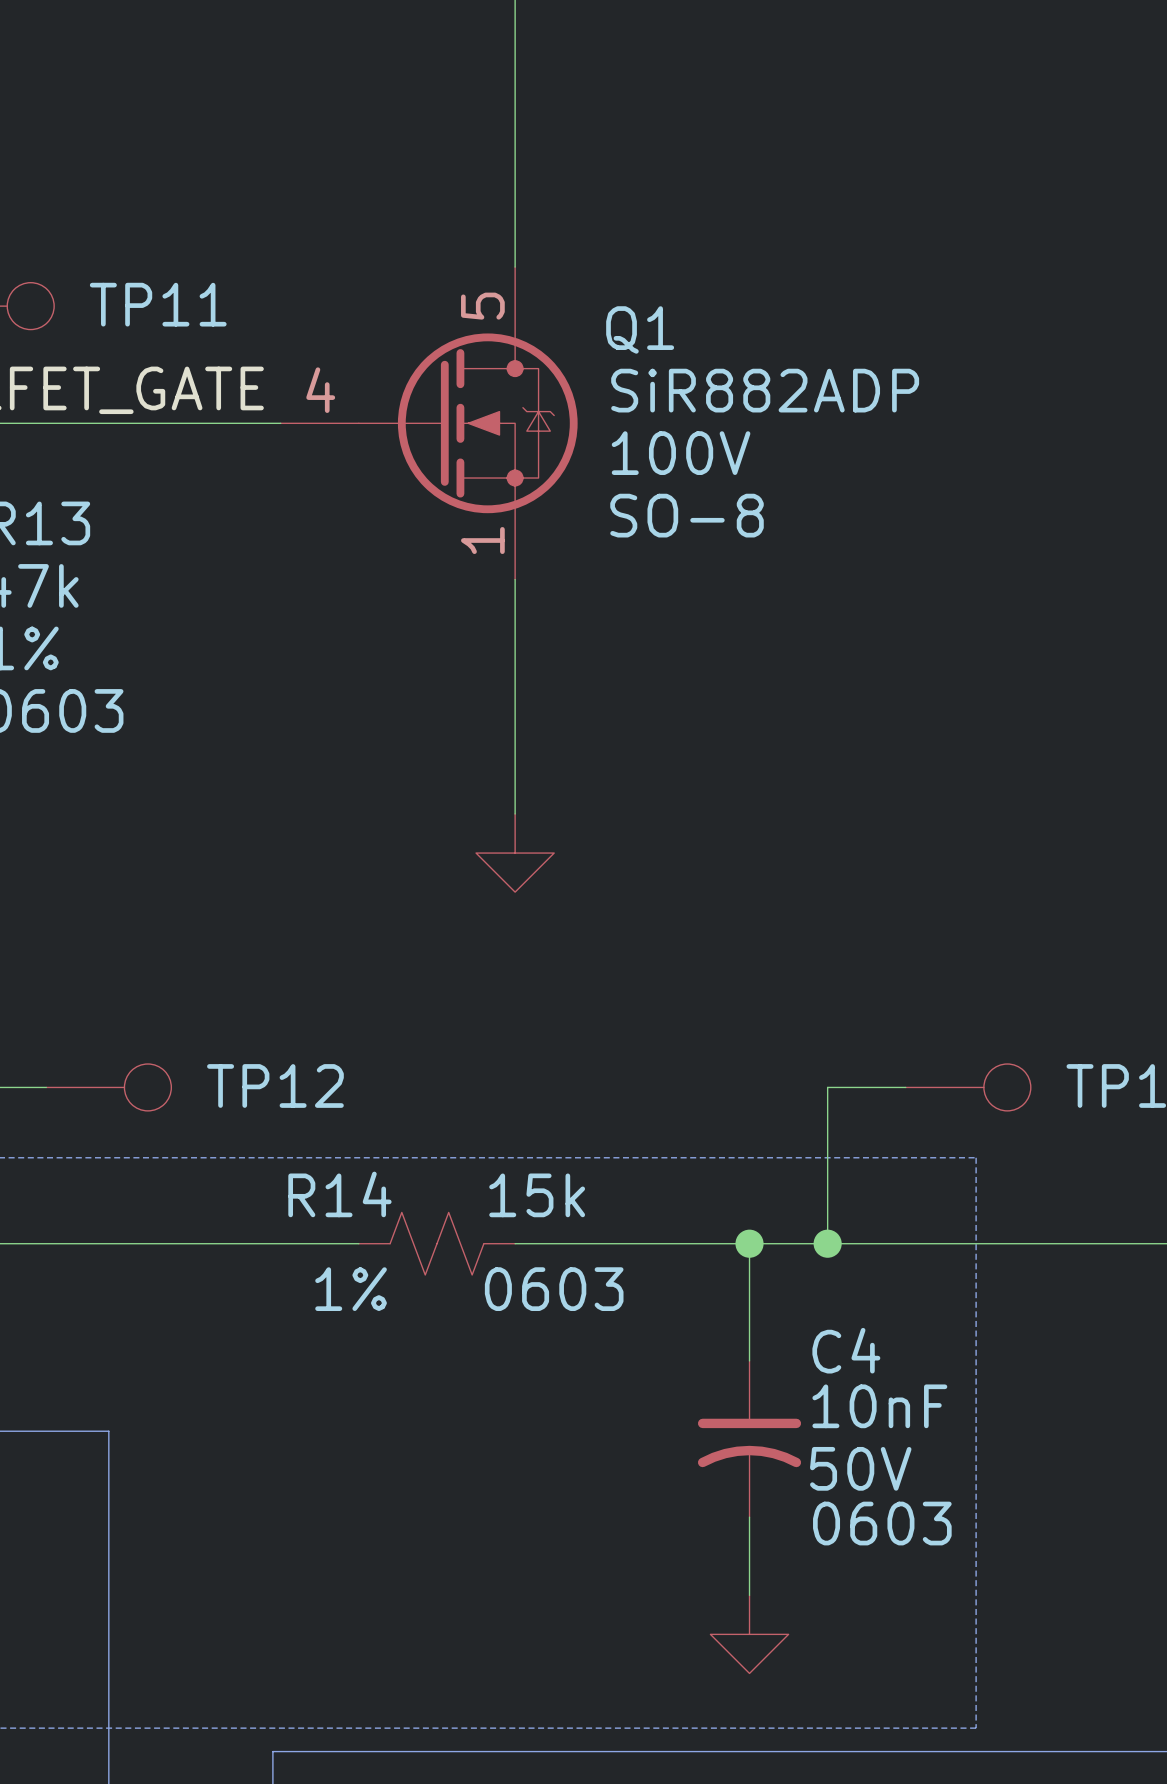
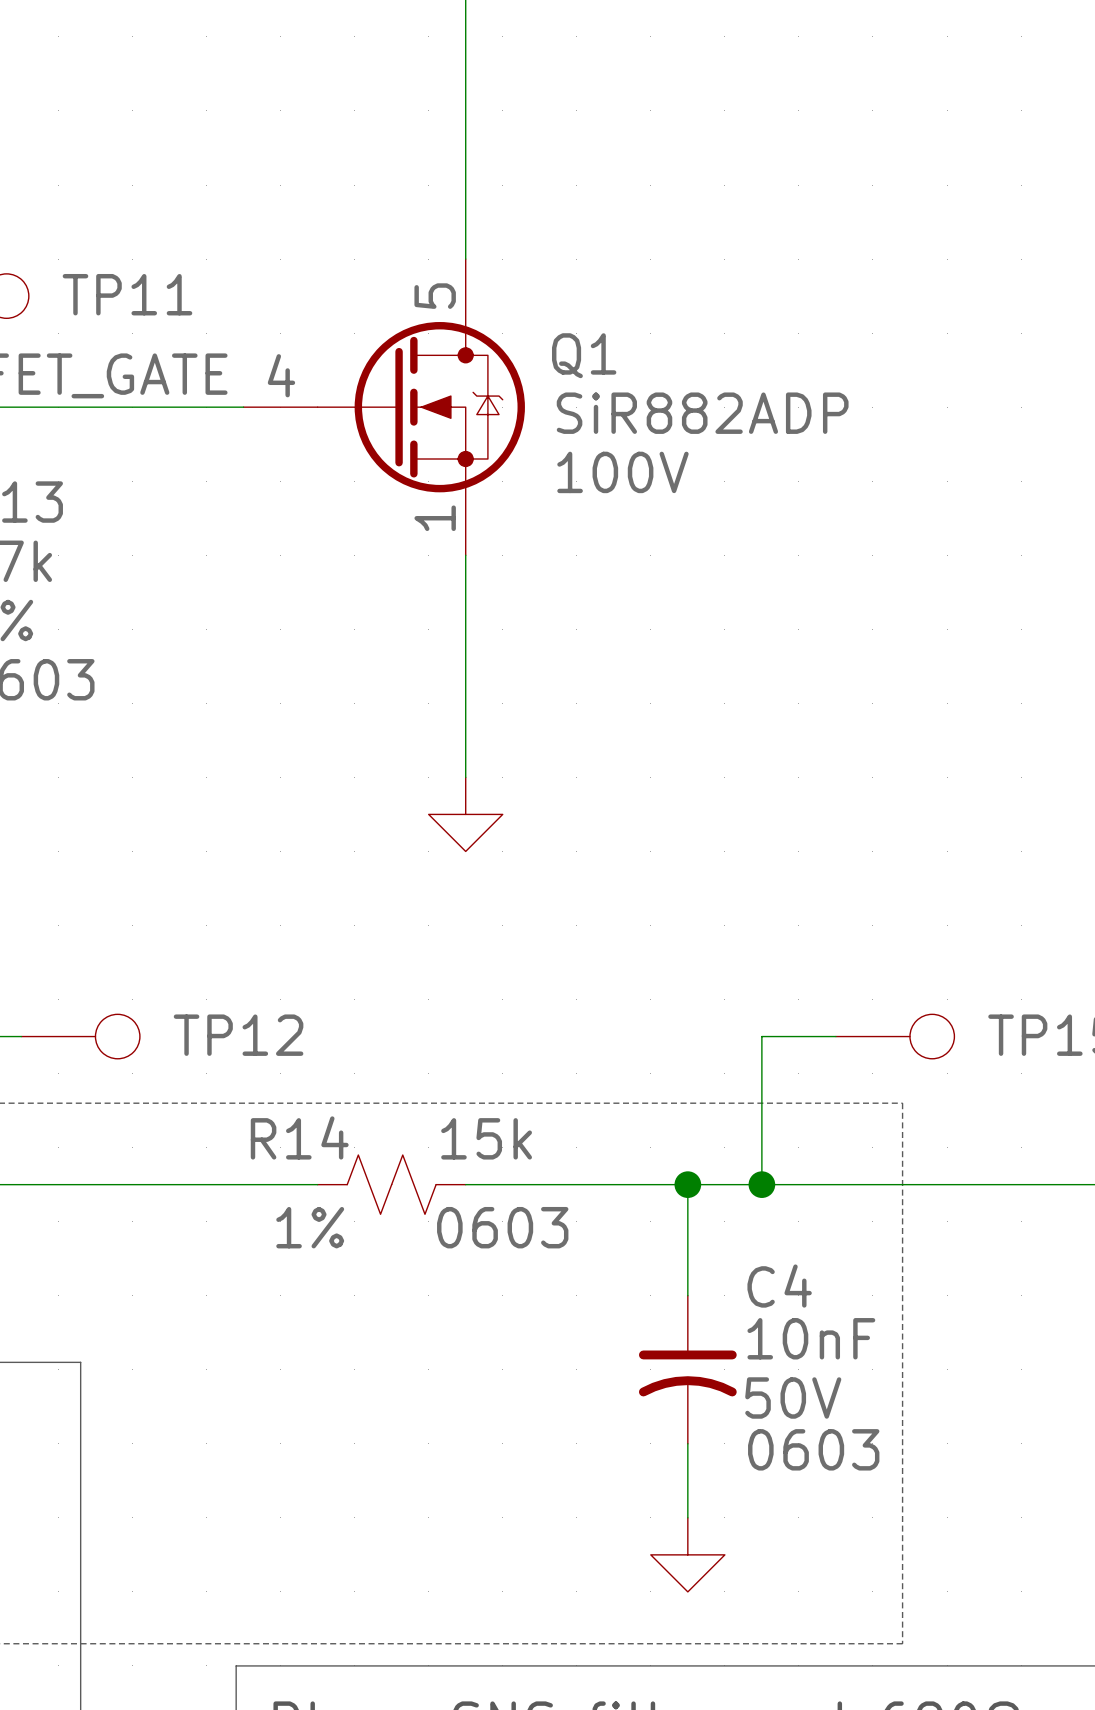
Q1 name position: Q1 (640, 329) -> Q1 (584, 355)
Q1 value position: SiR882ADP (765, 390) -> SiR882ADP (702, 413)
Q1 text position: 100V (681, 453) -> 100V (622, 472)
Q1 text: SO-8 (687, 515) -> none

